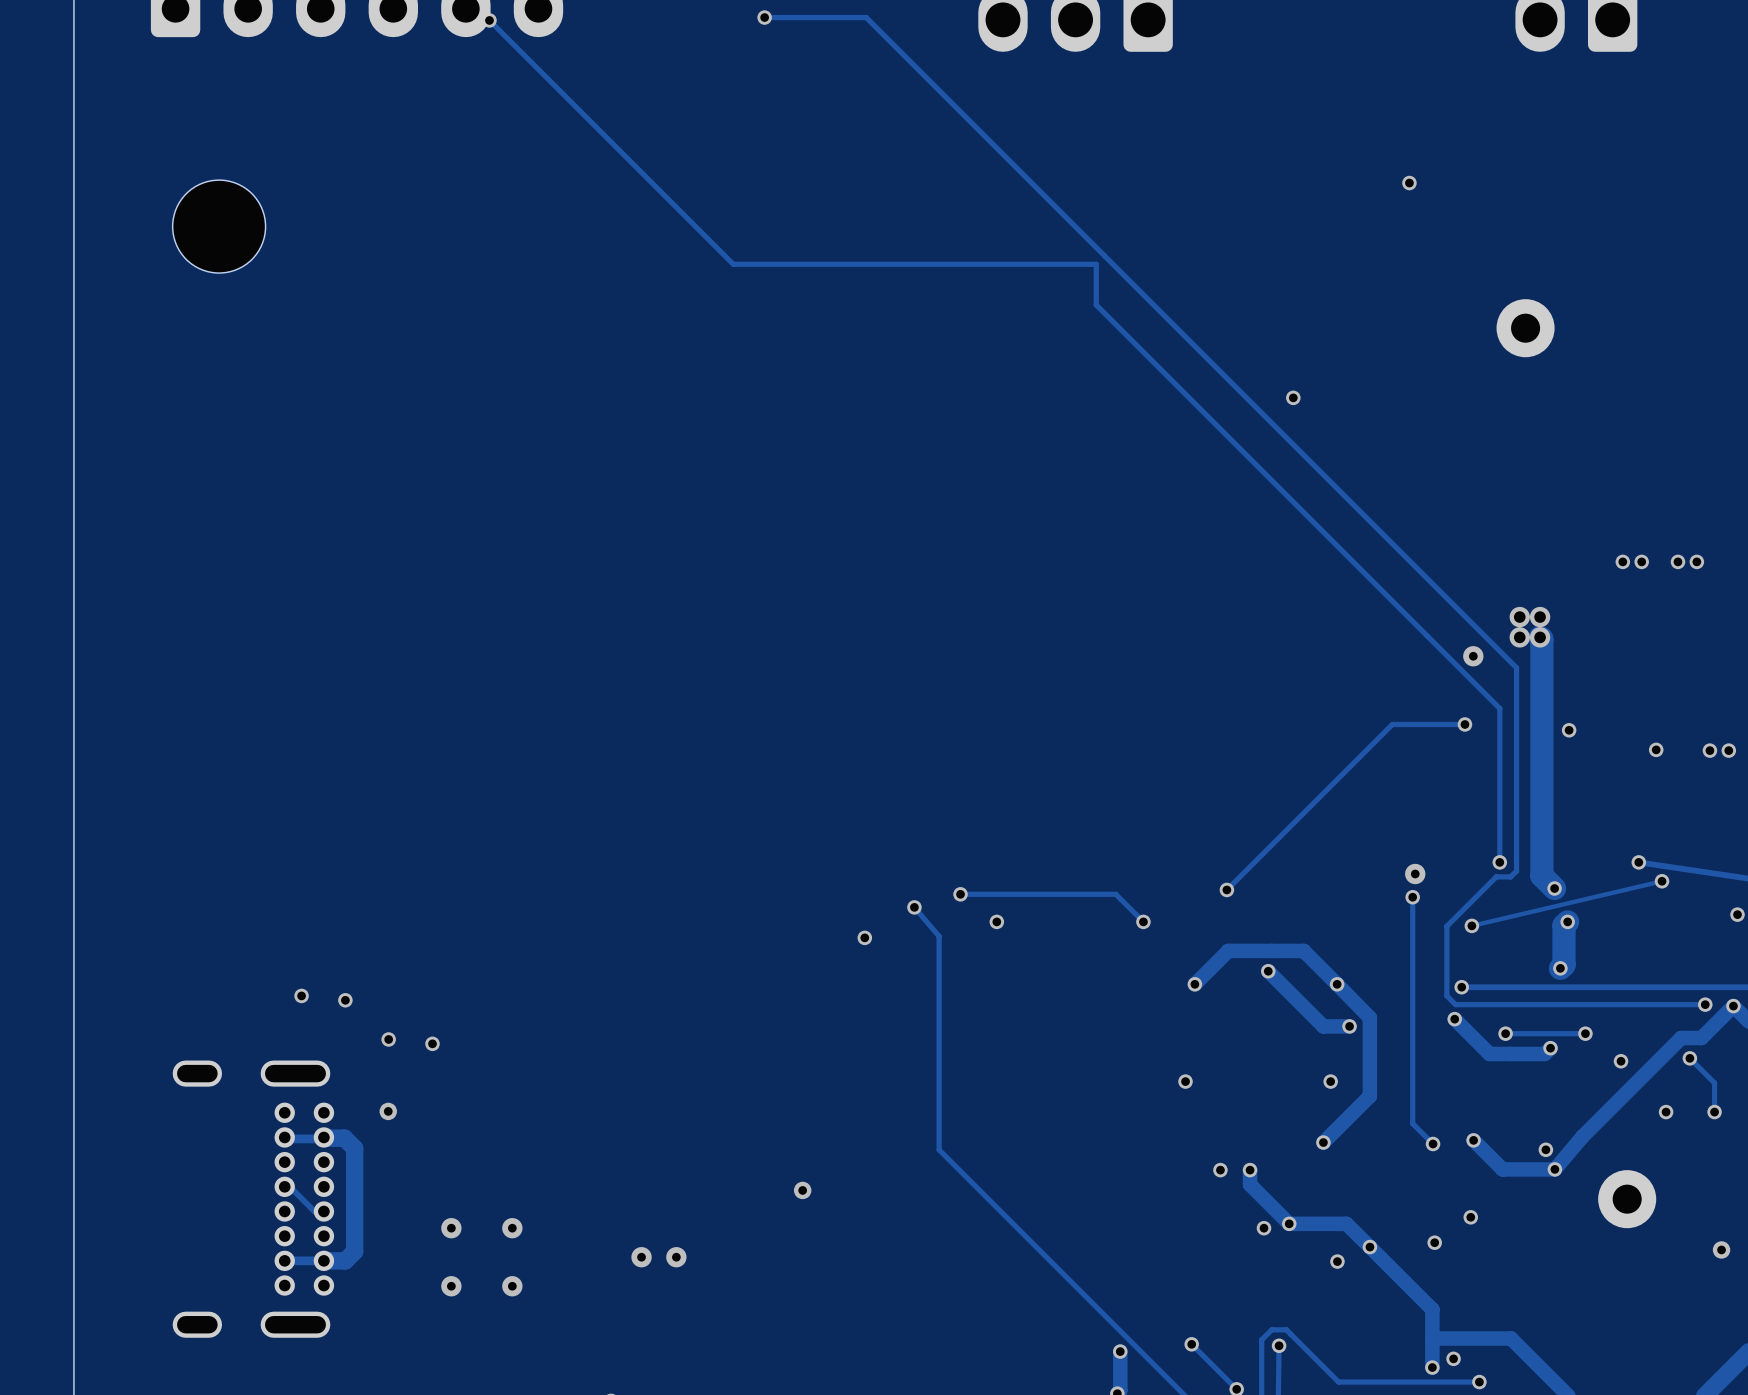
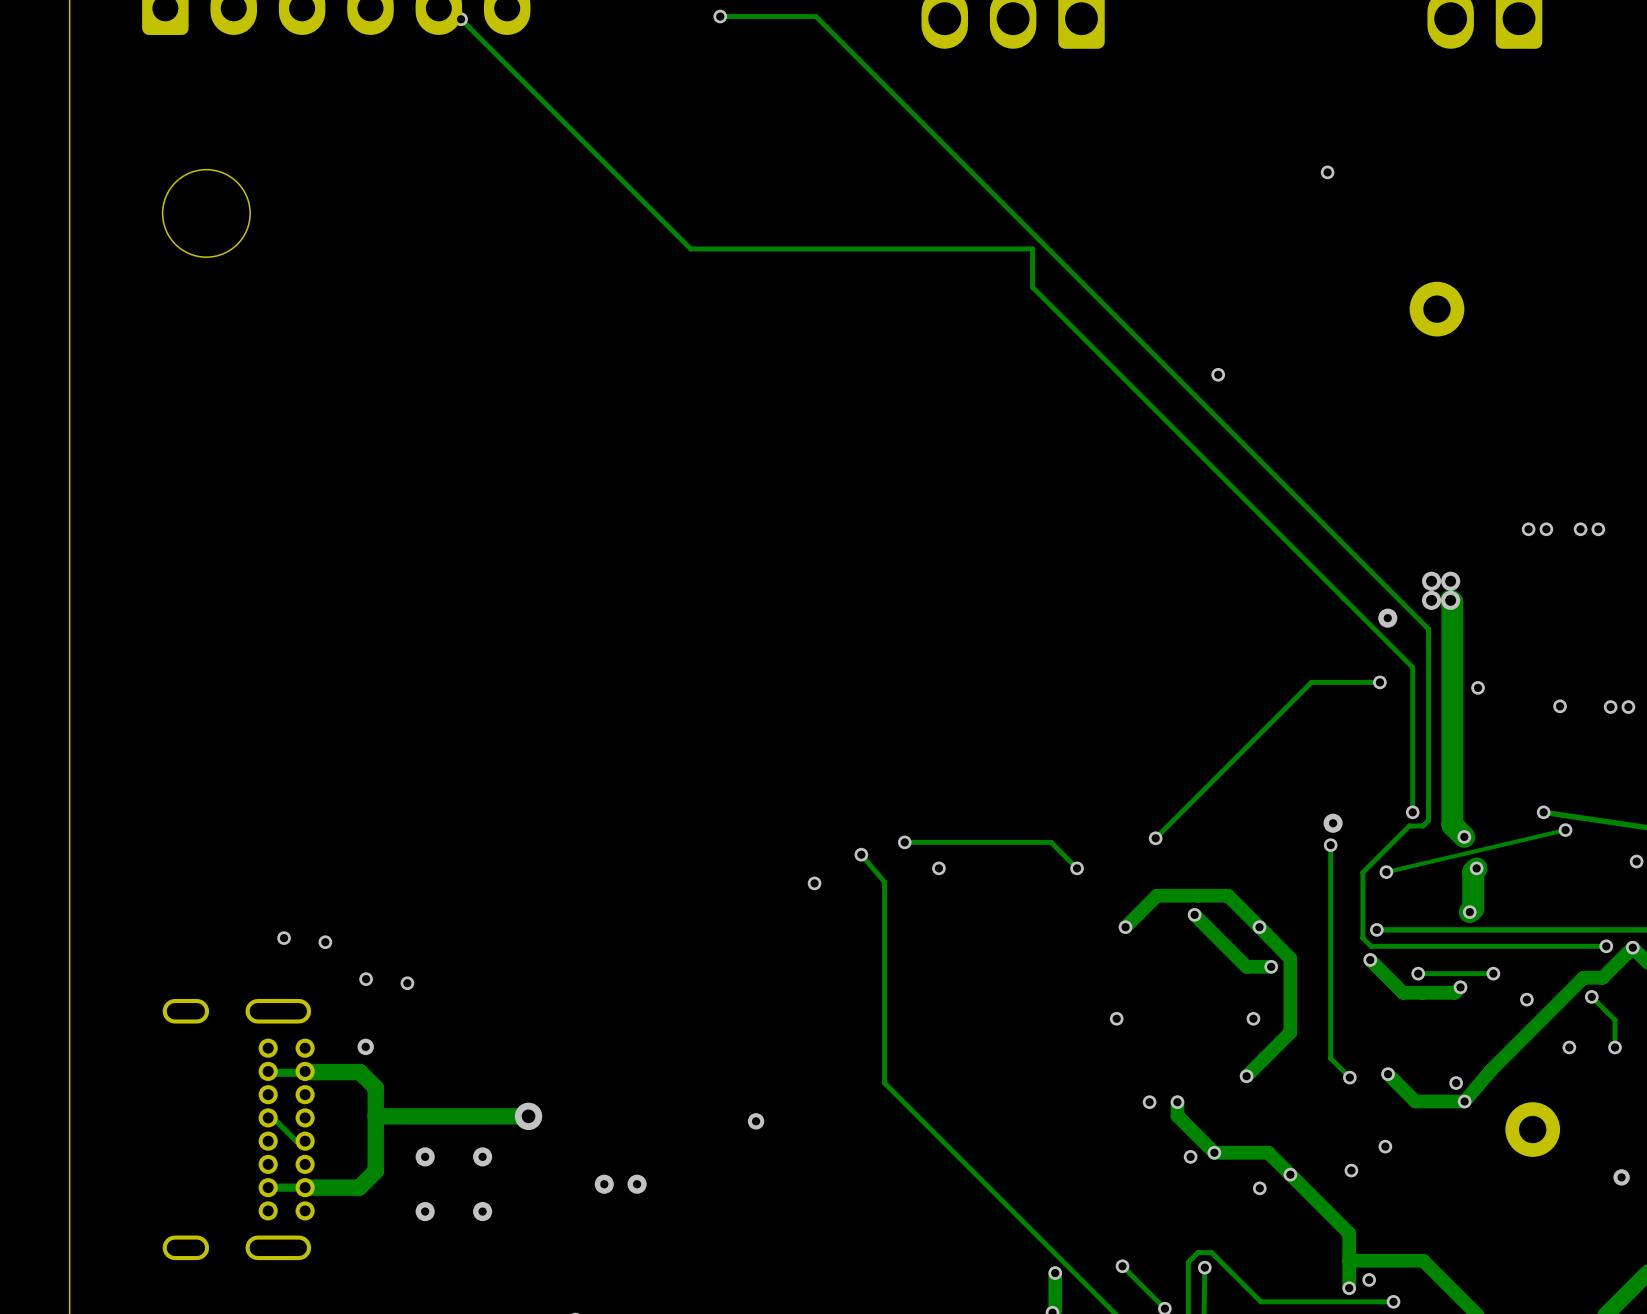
track: (344, 1138) (354, 1148) (354, 1251) (345, 1260) -> (324, 1072) (360, 1072) (375, 1087) (375, 1171) (359, 1187) (325, 1187)
track: none -> (528, 1116) (375, 1116)
via: none -> (528, 1116)

